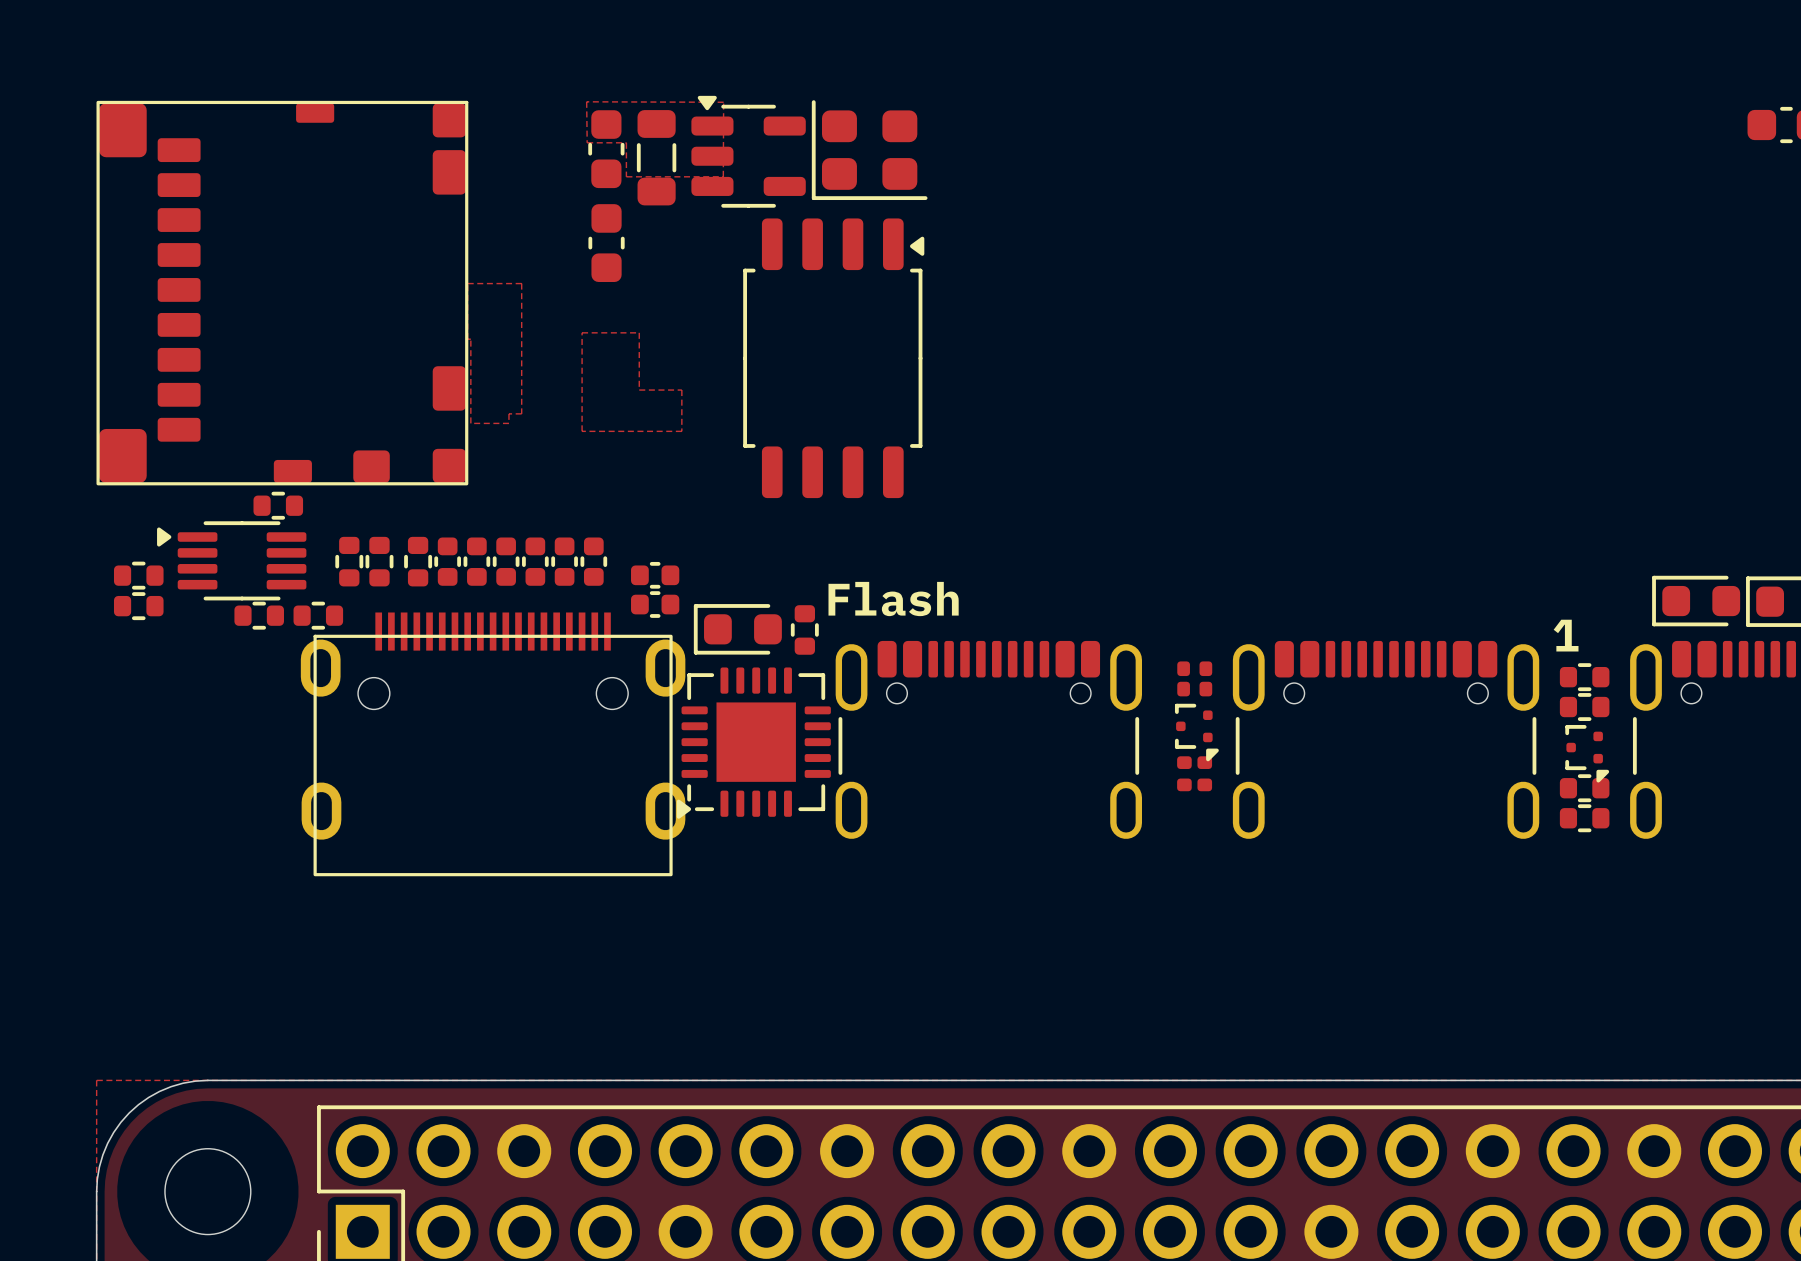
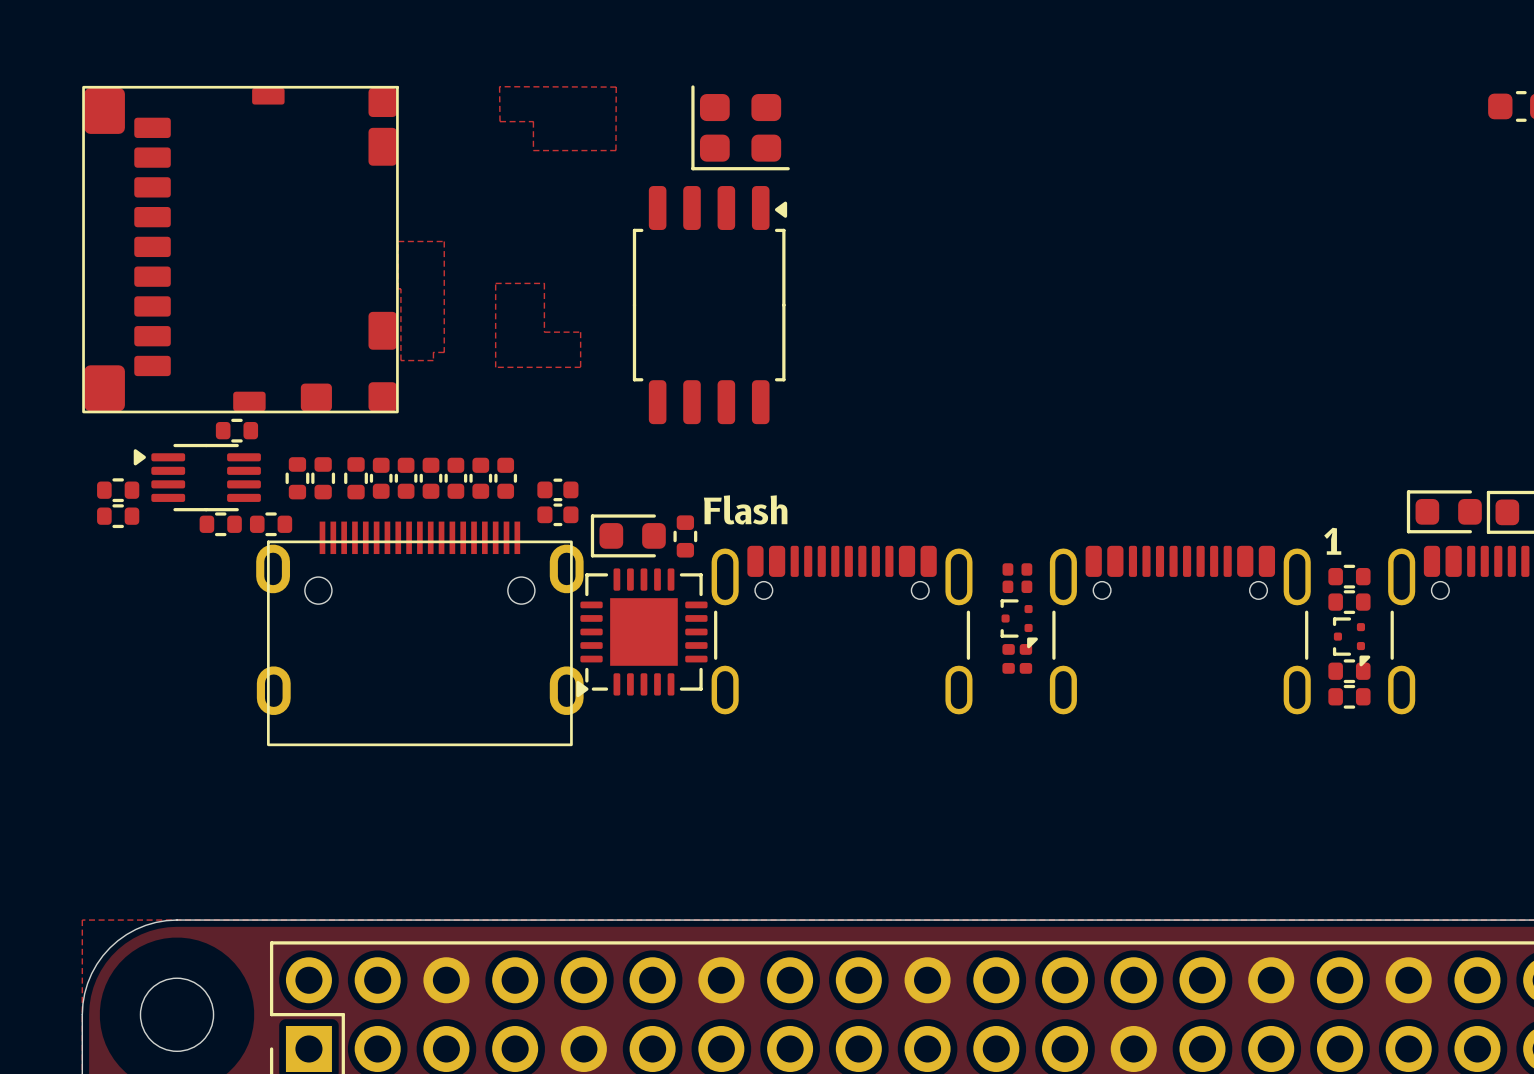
part: (606, 149) -> none
part: (748, 151) -> none
part: (656, 157) -> none
part: (606, 243) -> none

